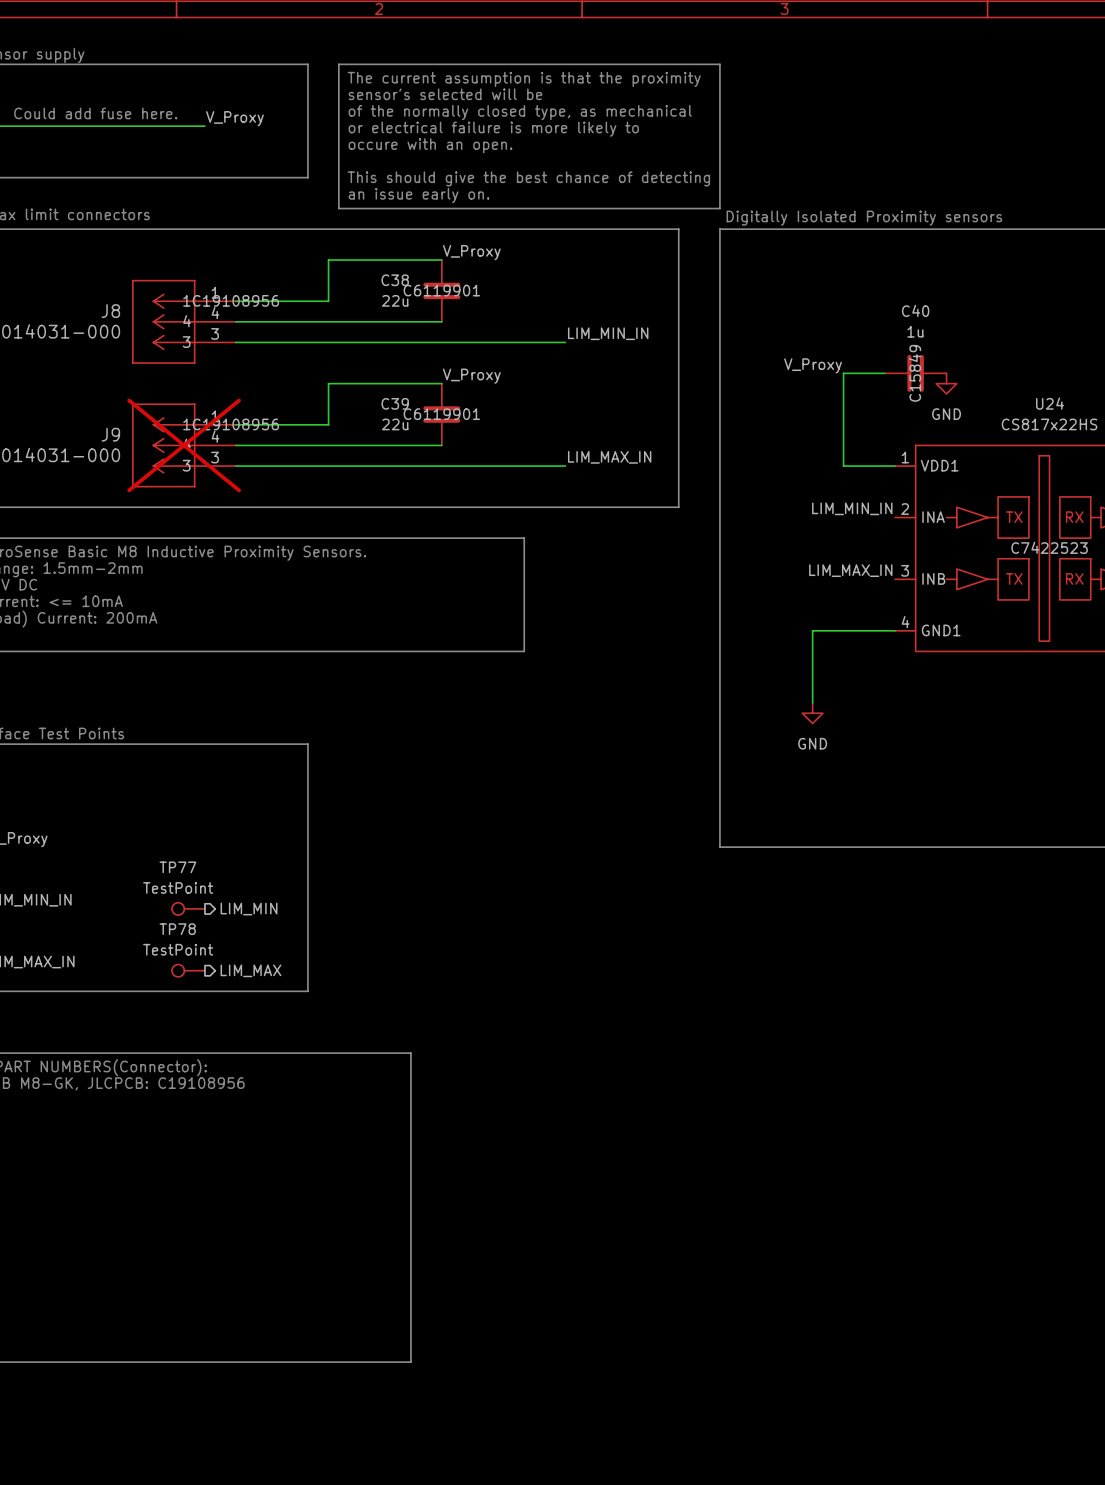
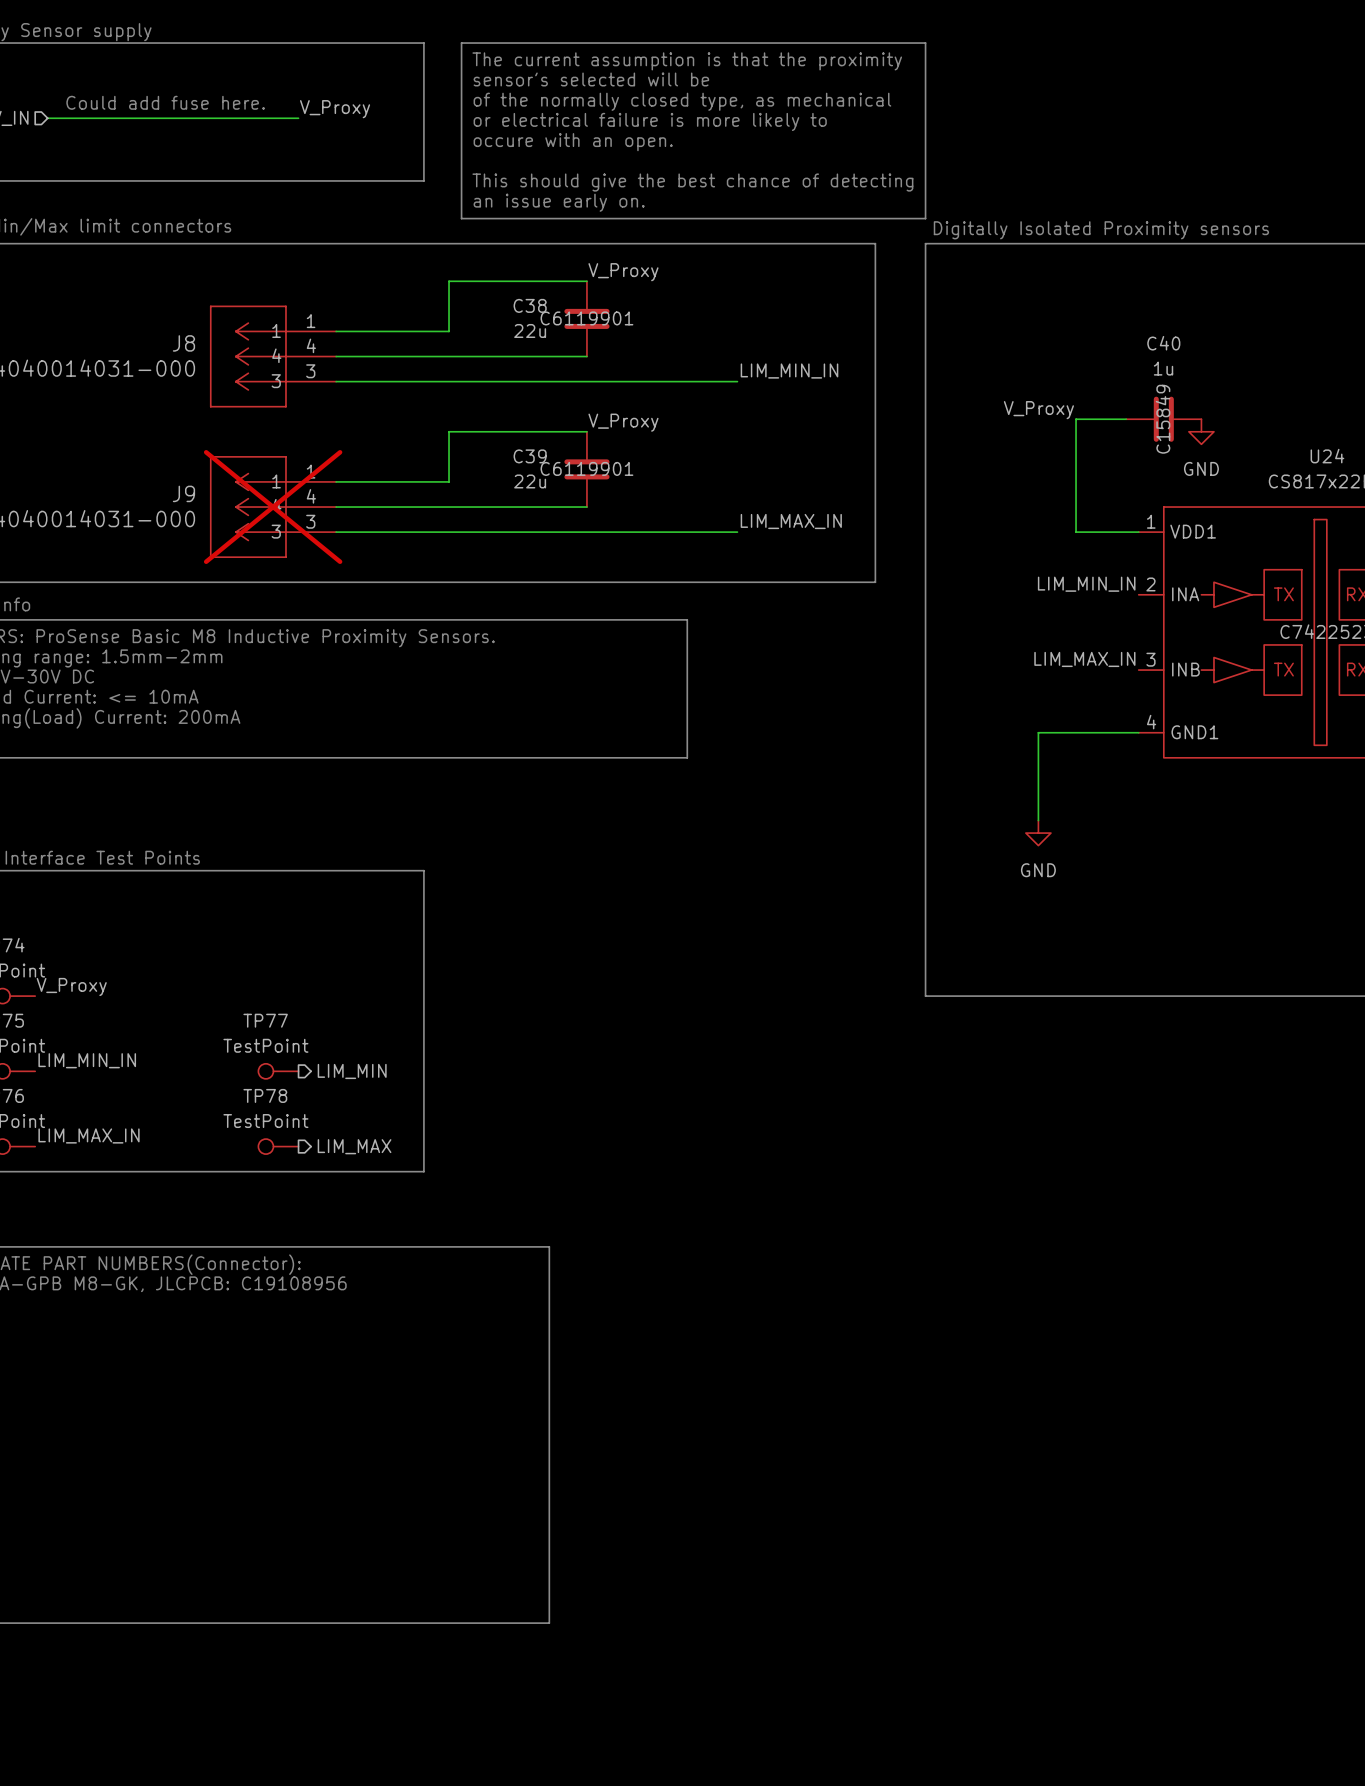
J8 text: C19108956 (235, 300) -> none
J9 text: C19108956 (235, 424) -> none

